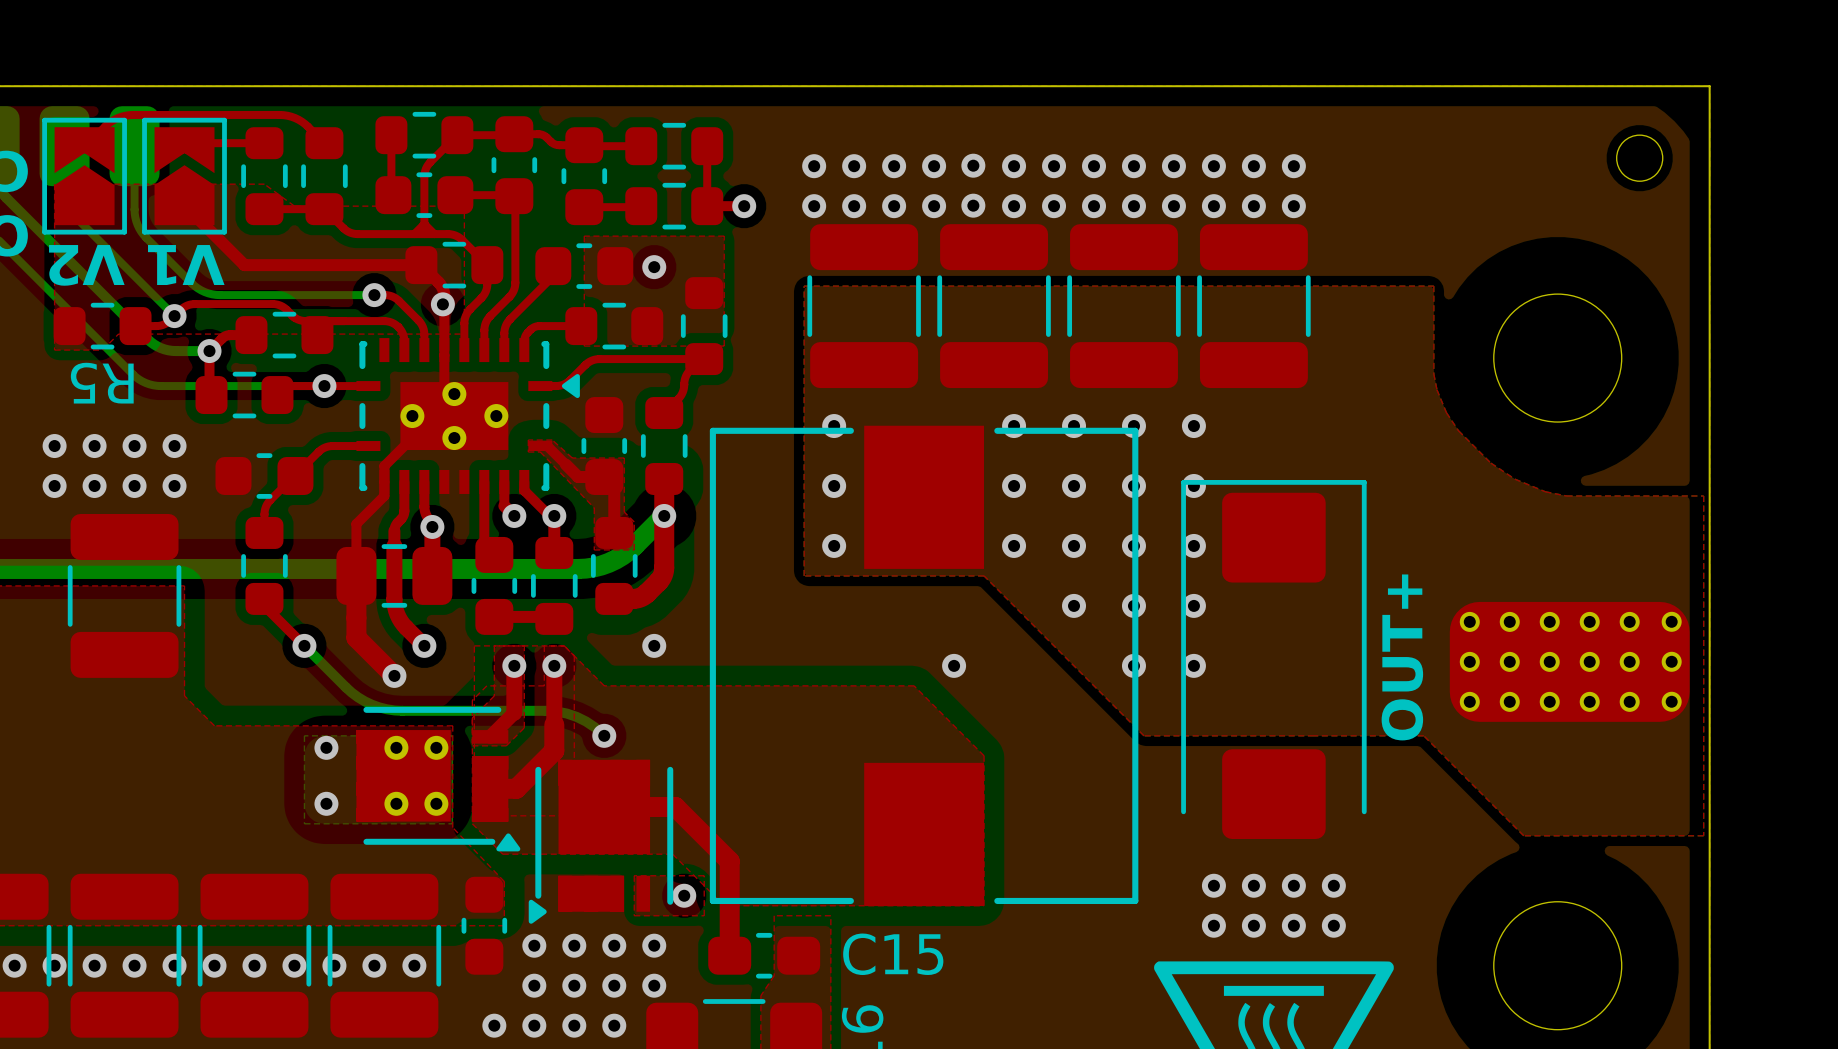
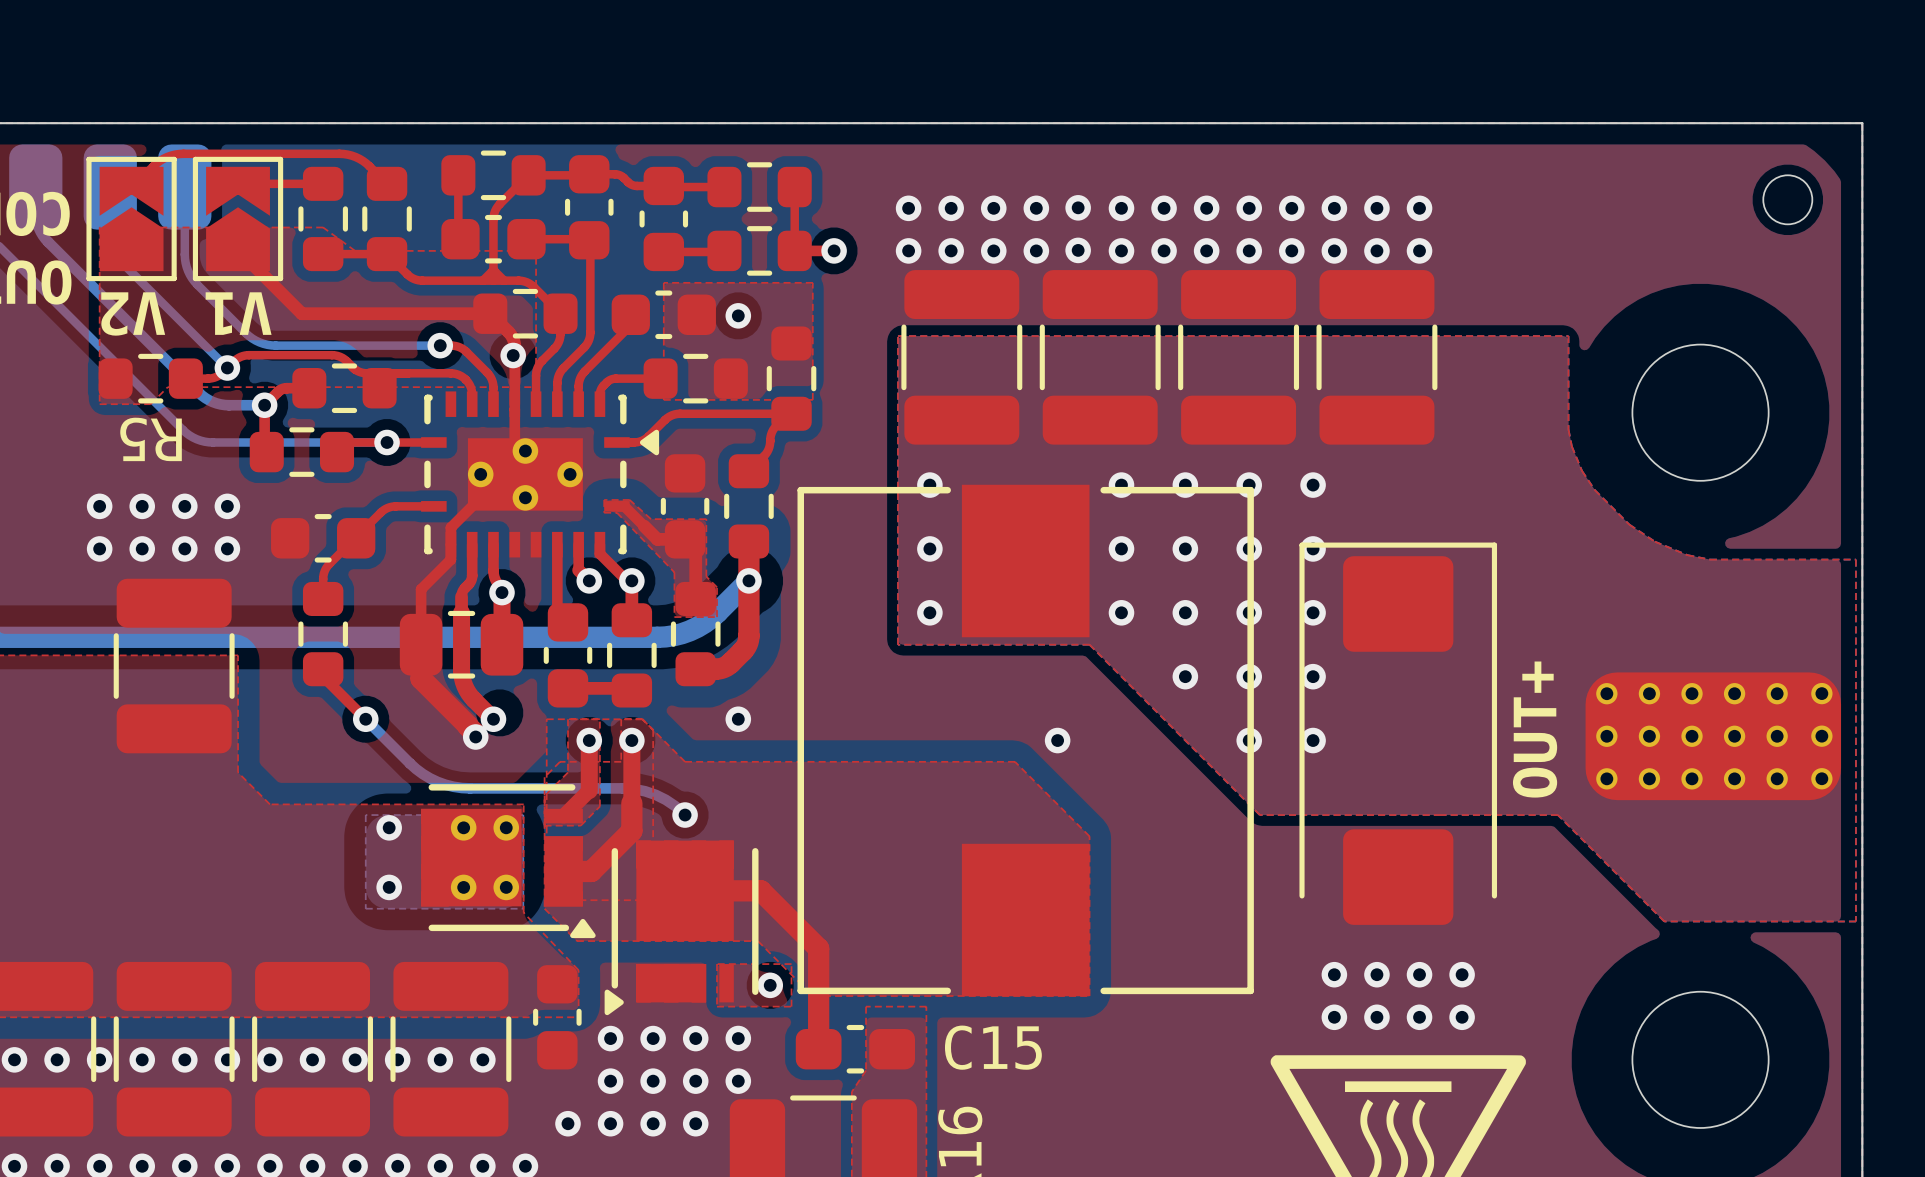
top track: (356, 607) (356, 637) (394, 675) -> (421, 678) (467, 725)
via position: (394, 675) -> (475, 737)

